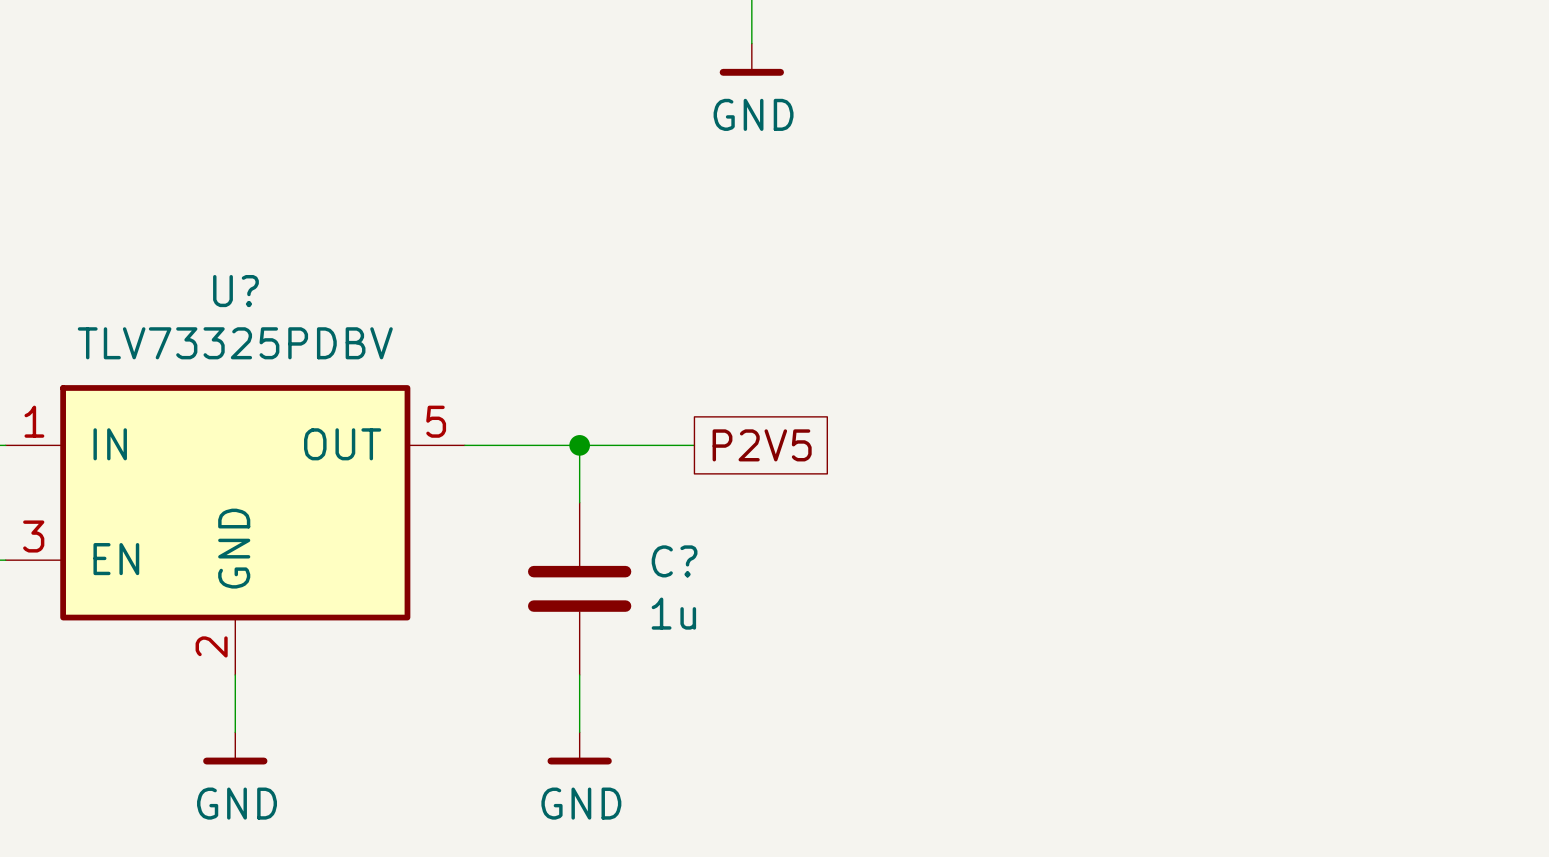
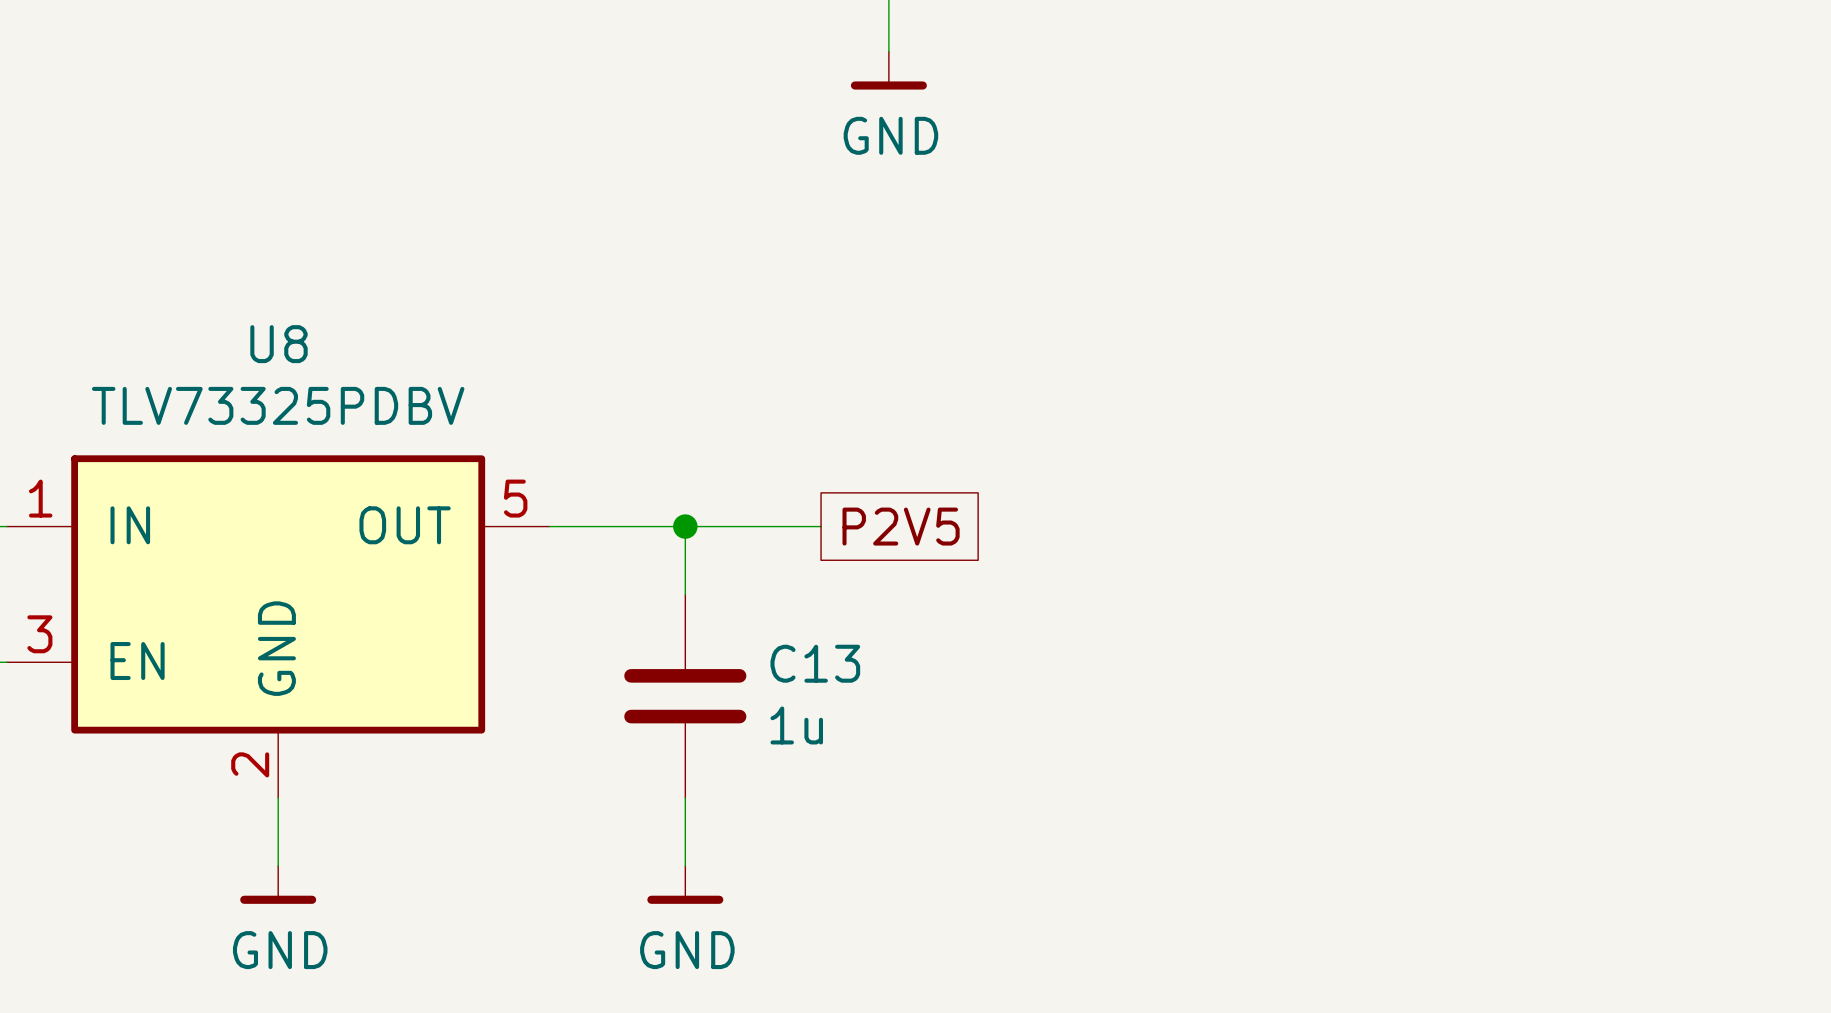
U? name: U? (235, 291) -> U8 (278, 344)
C? name: C? (674, 561) -> C13 (815, 663)

